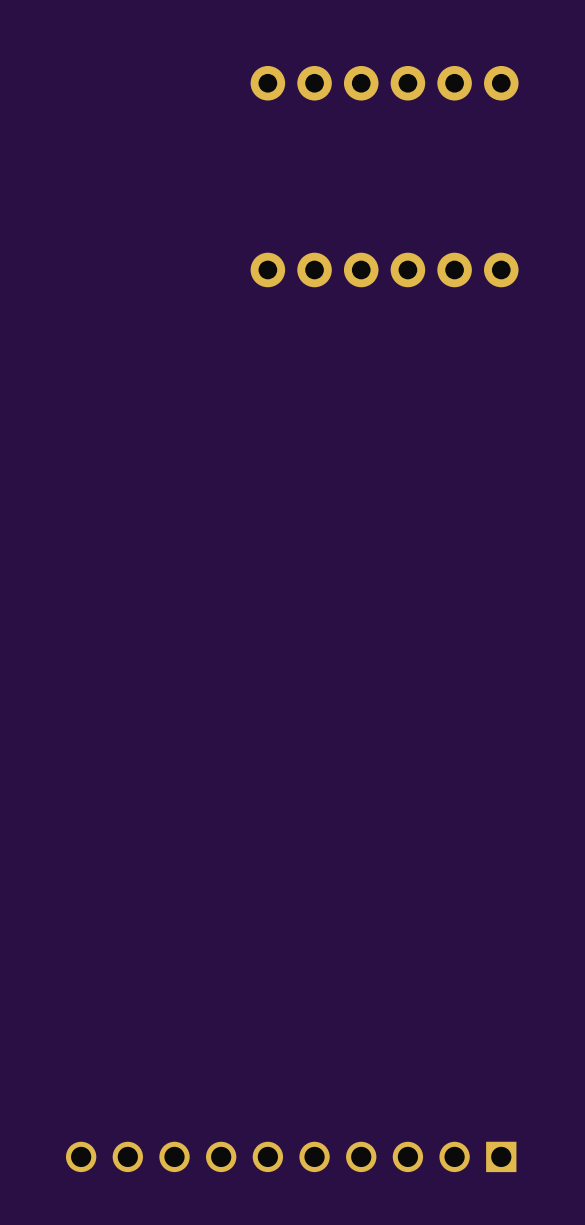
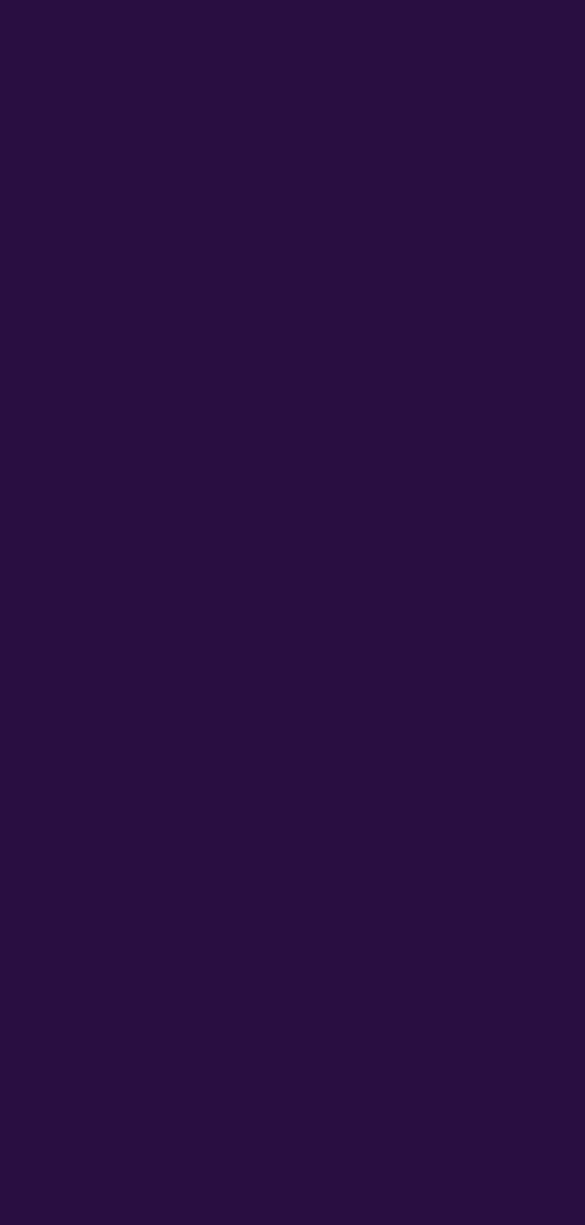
part: (384, 83) -> none
part: (384, 269) -> none
part: (291, 1156) -> none

